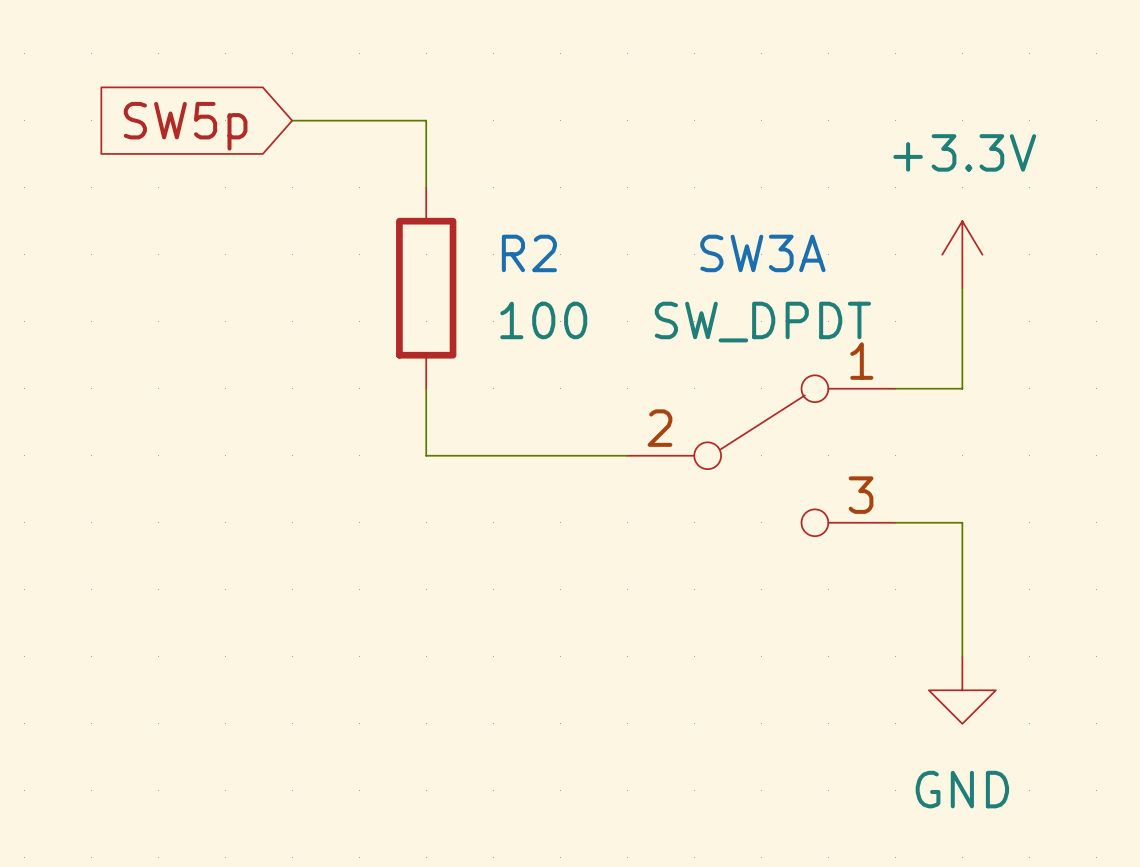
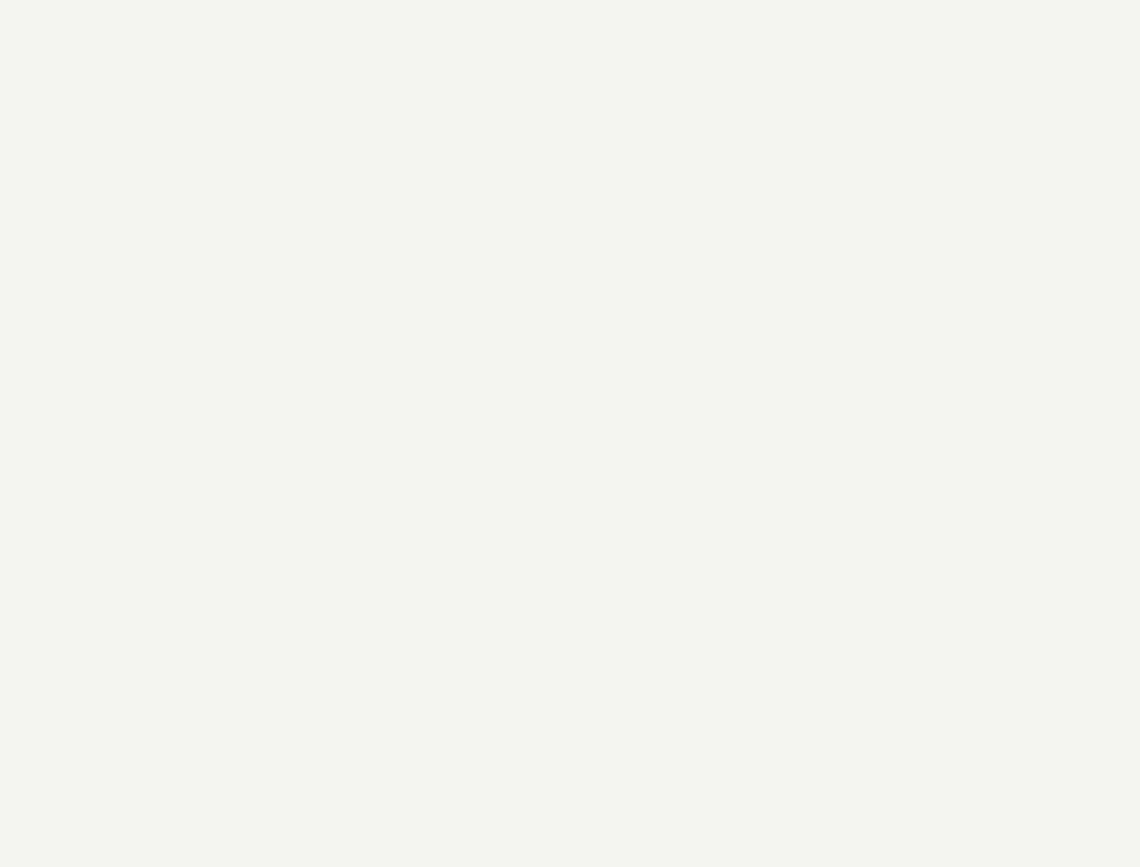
wire: (292, 120) (426, 120) (426, 187) -> none
global label: SW5p (185, 126) -> none
power symbol: +3.3V (962, 254) -> none
R2: 100 (426, 288) -> none
wire: (962, 288) (962, 388) (895, 388) -> none
wire: (426, 388) (426, 455) (627, 455) -> none
SW3A: SW_DPDT (761, 455) -> none
wire: (895, 522) (962, 522) (962, 656) -> none
power symbol: GND (962, 690) -> none

